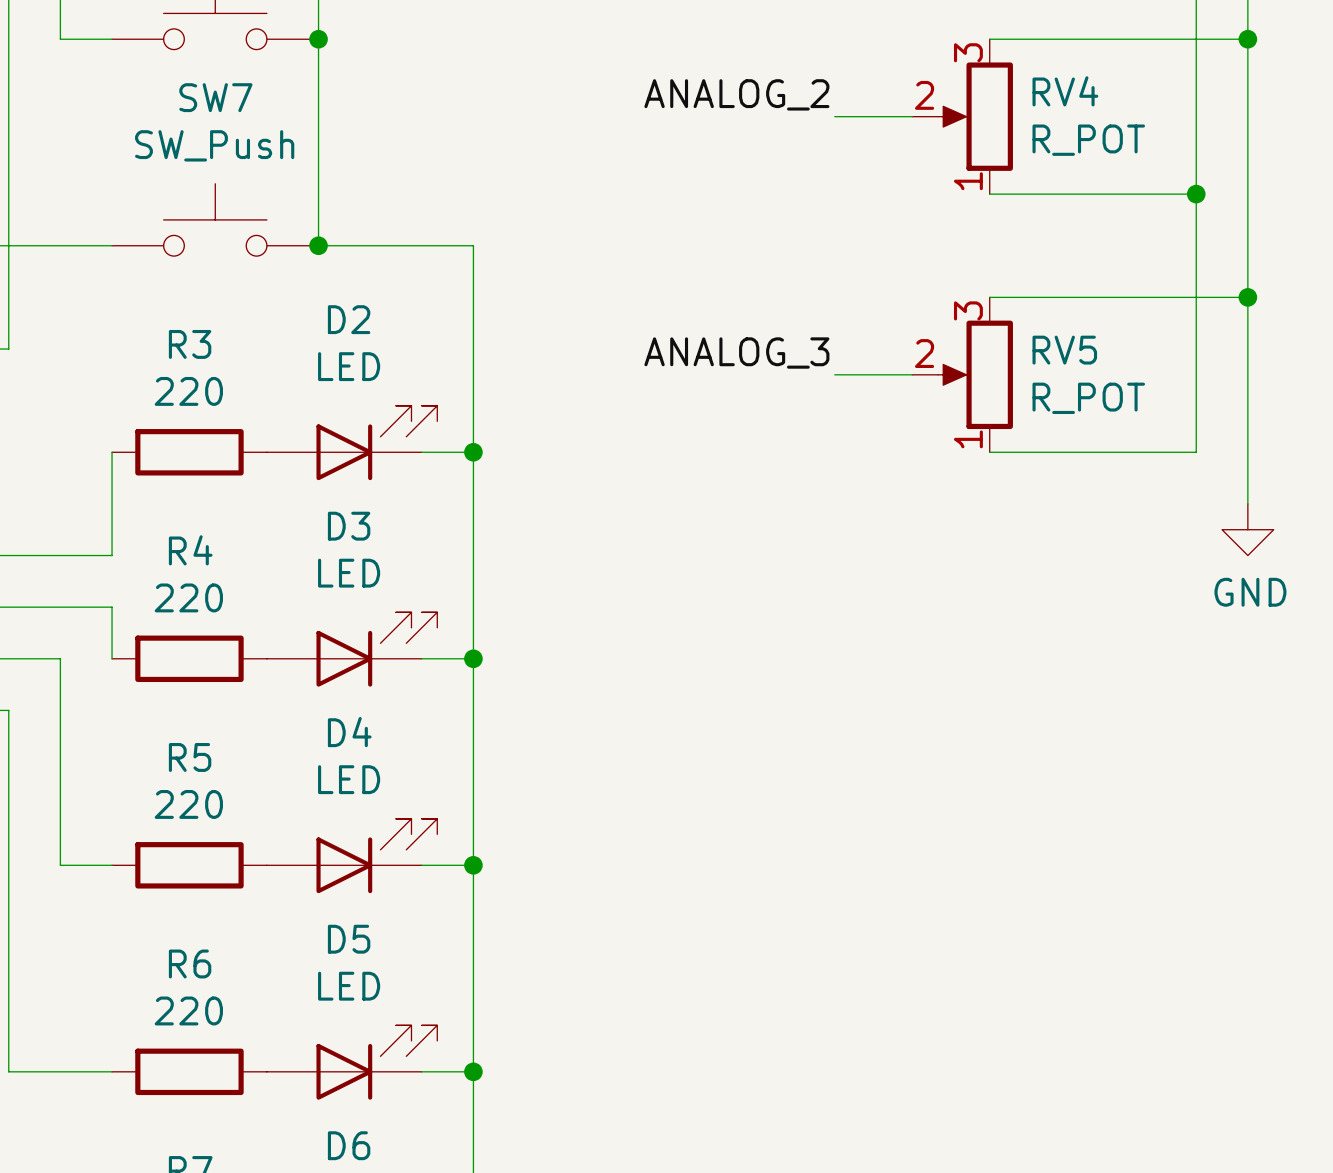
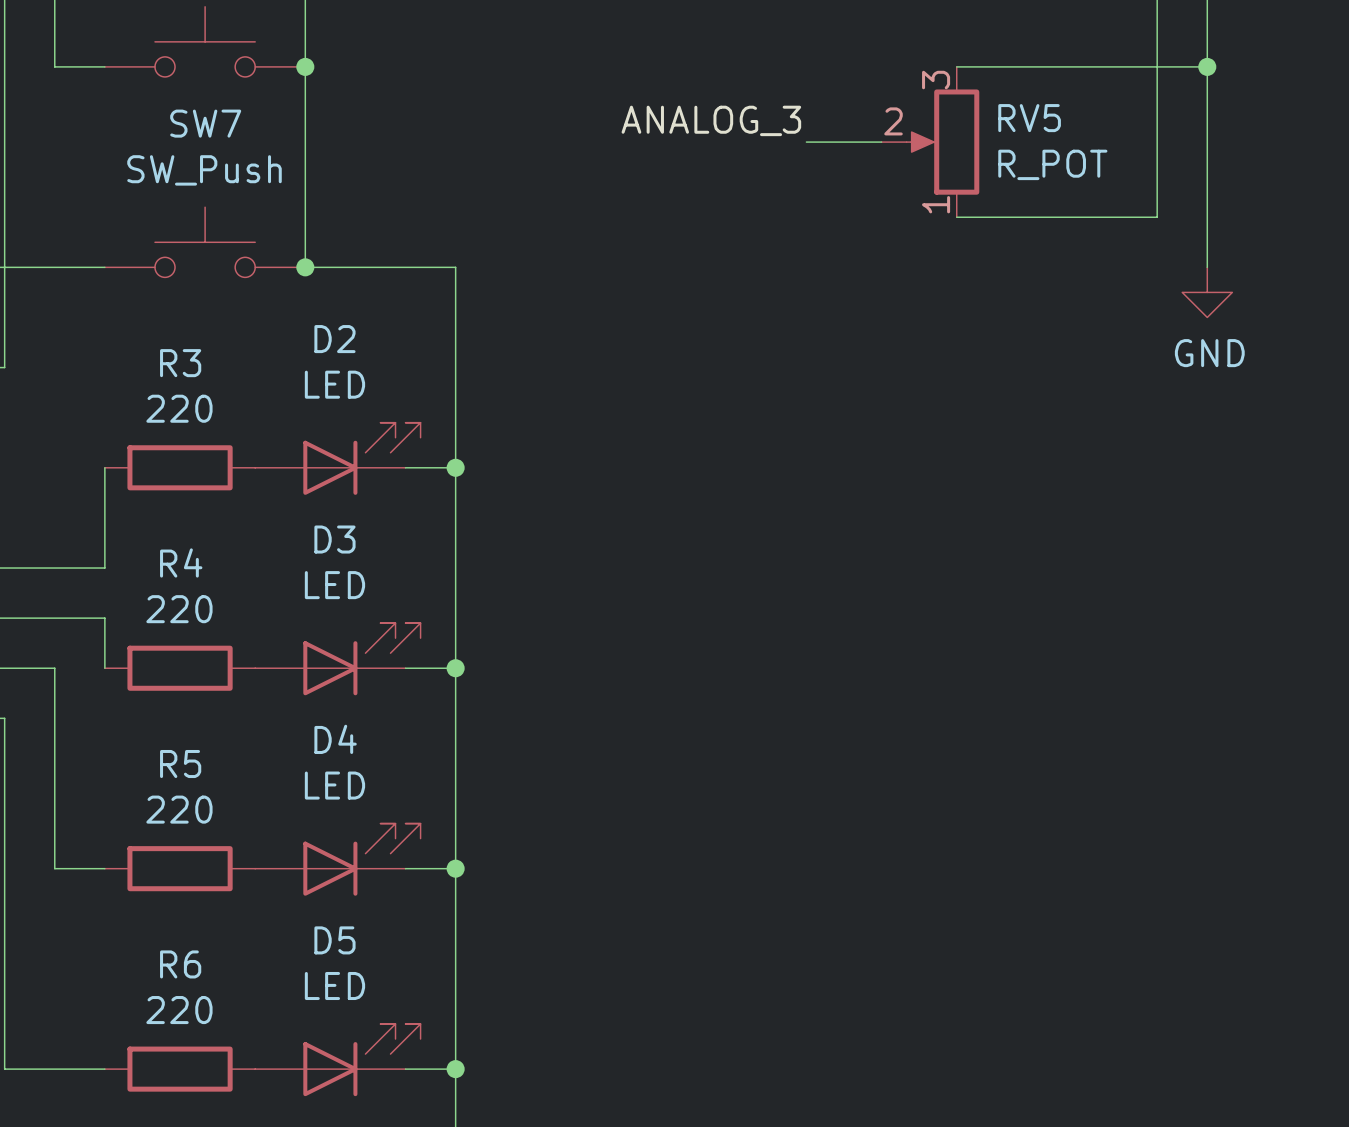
RV4 name: RV4 (1065, 91) -> RV5 (1029, 118)
label: ANALOG_2 (736, 94) -> ANALOG_3 (711, 120)
wire: (1196, 194) (1196, 452) (989, 452) -> none
junction: (1196, 194) -> none
wire: (1247, 245) (1247, 503) -> none
wire: (989, 297) (1247, 297) -> none
junction: (1247, 297) -> none
label: ANALOG_3 (736, 353) -> none
wire: (834, 374) (912, 374) -> none
RV5: R_POT (962, 374) -> none
power symbol position: GND (1247, 529) -> GND (1207, 292)

